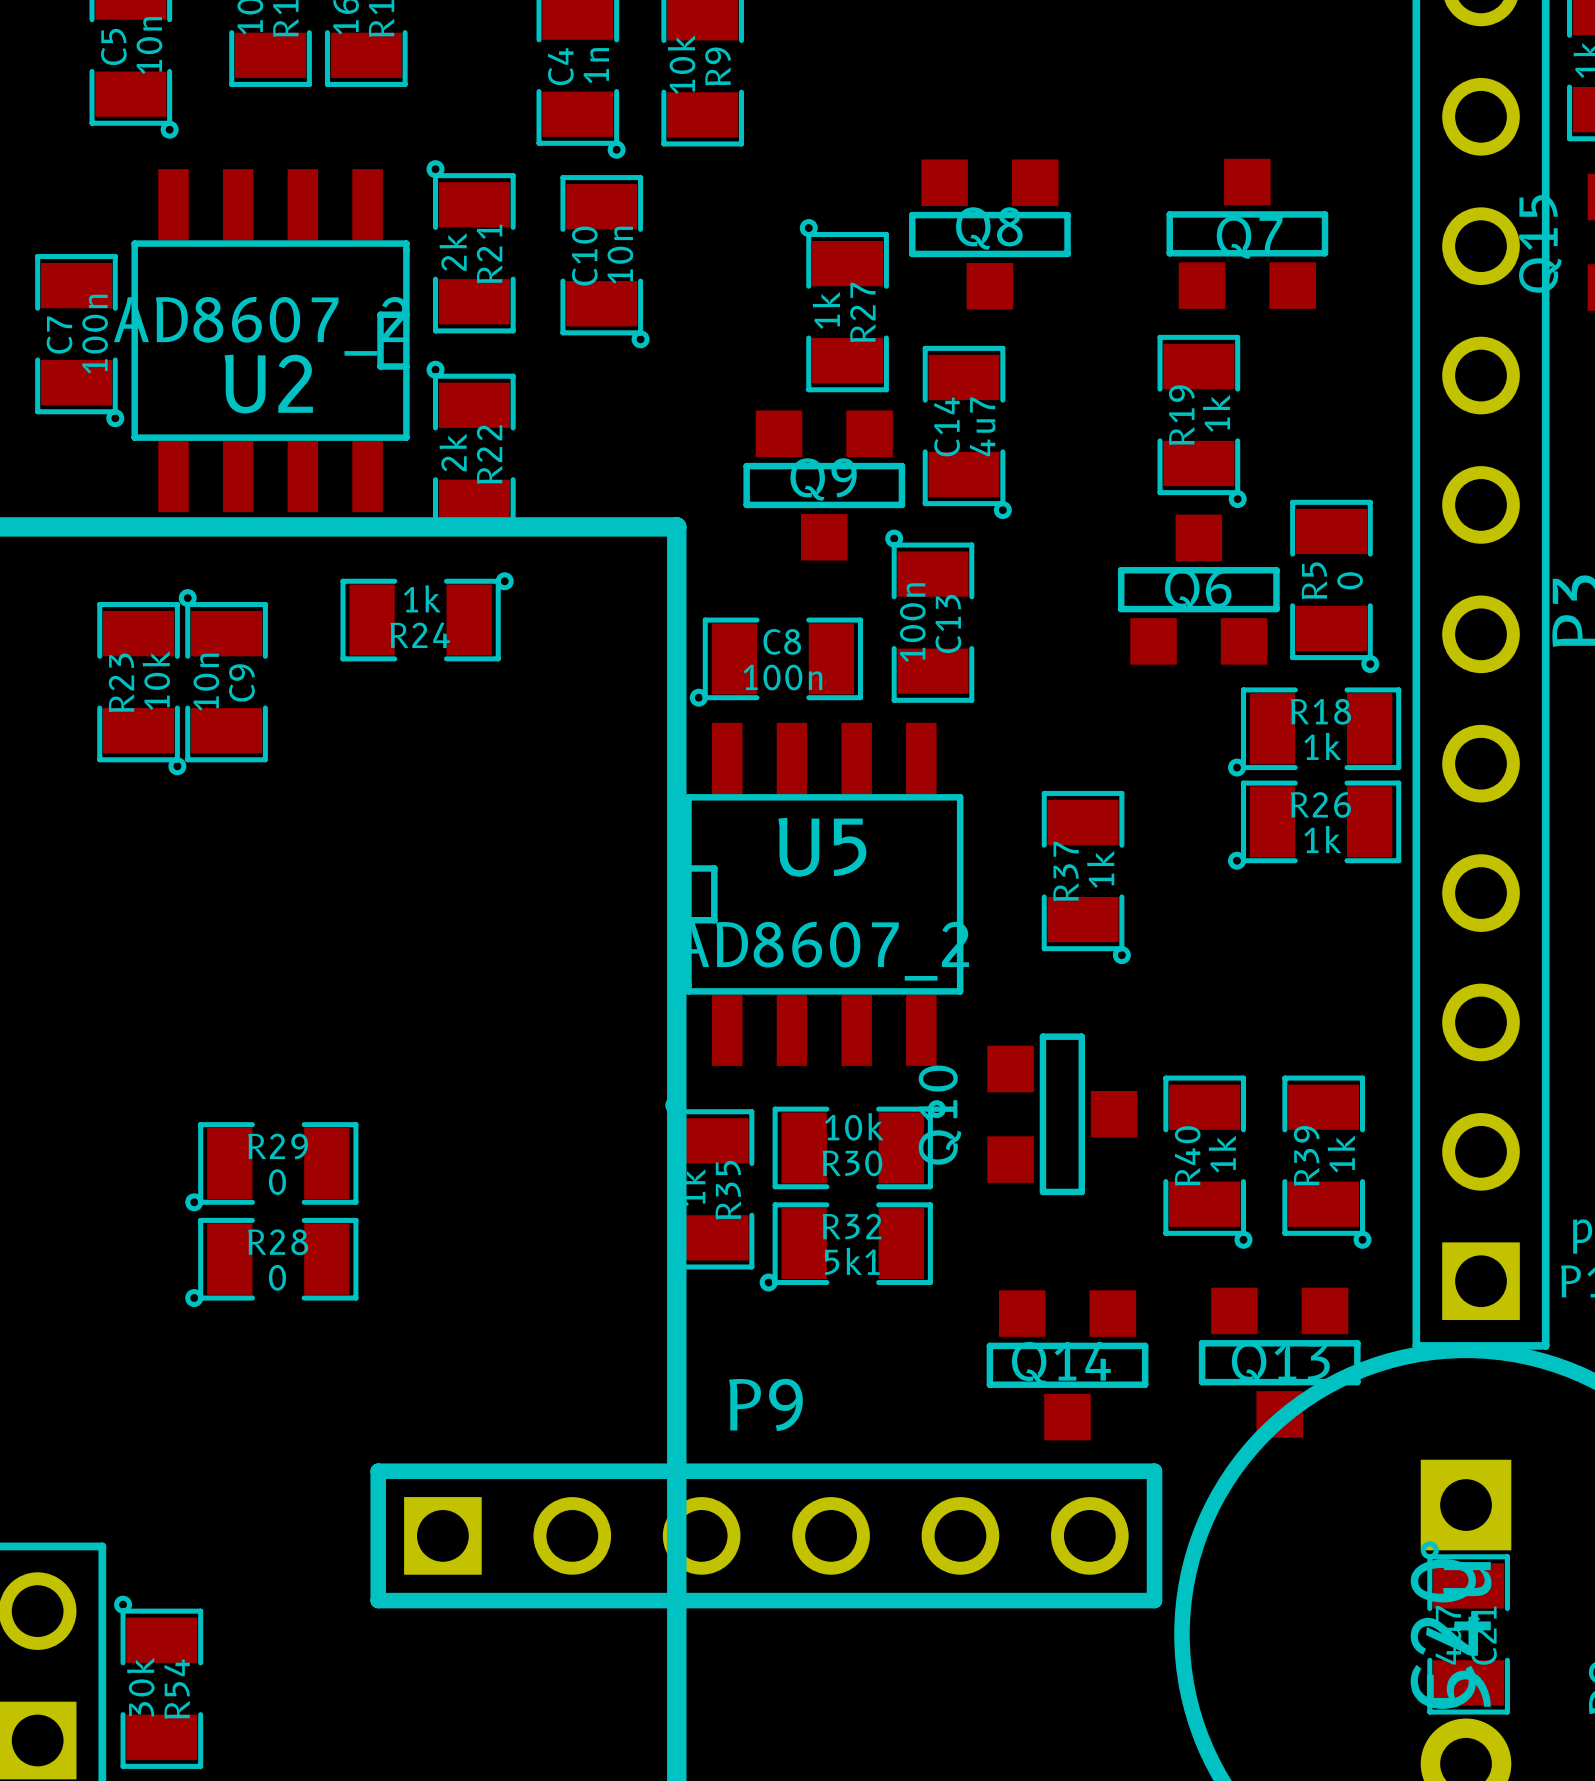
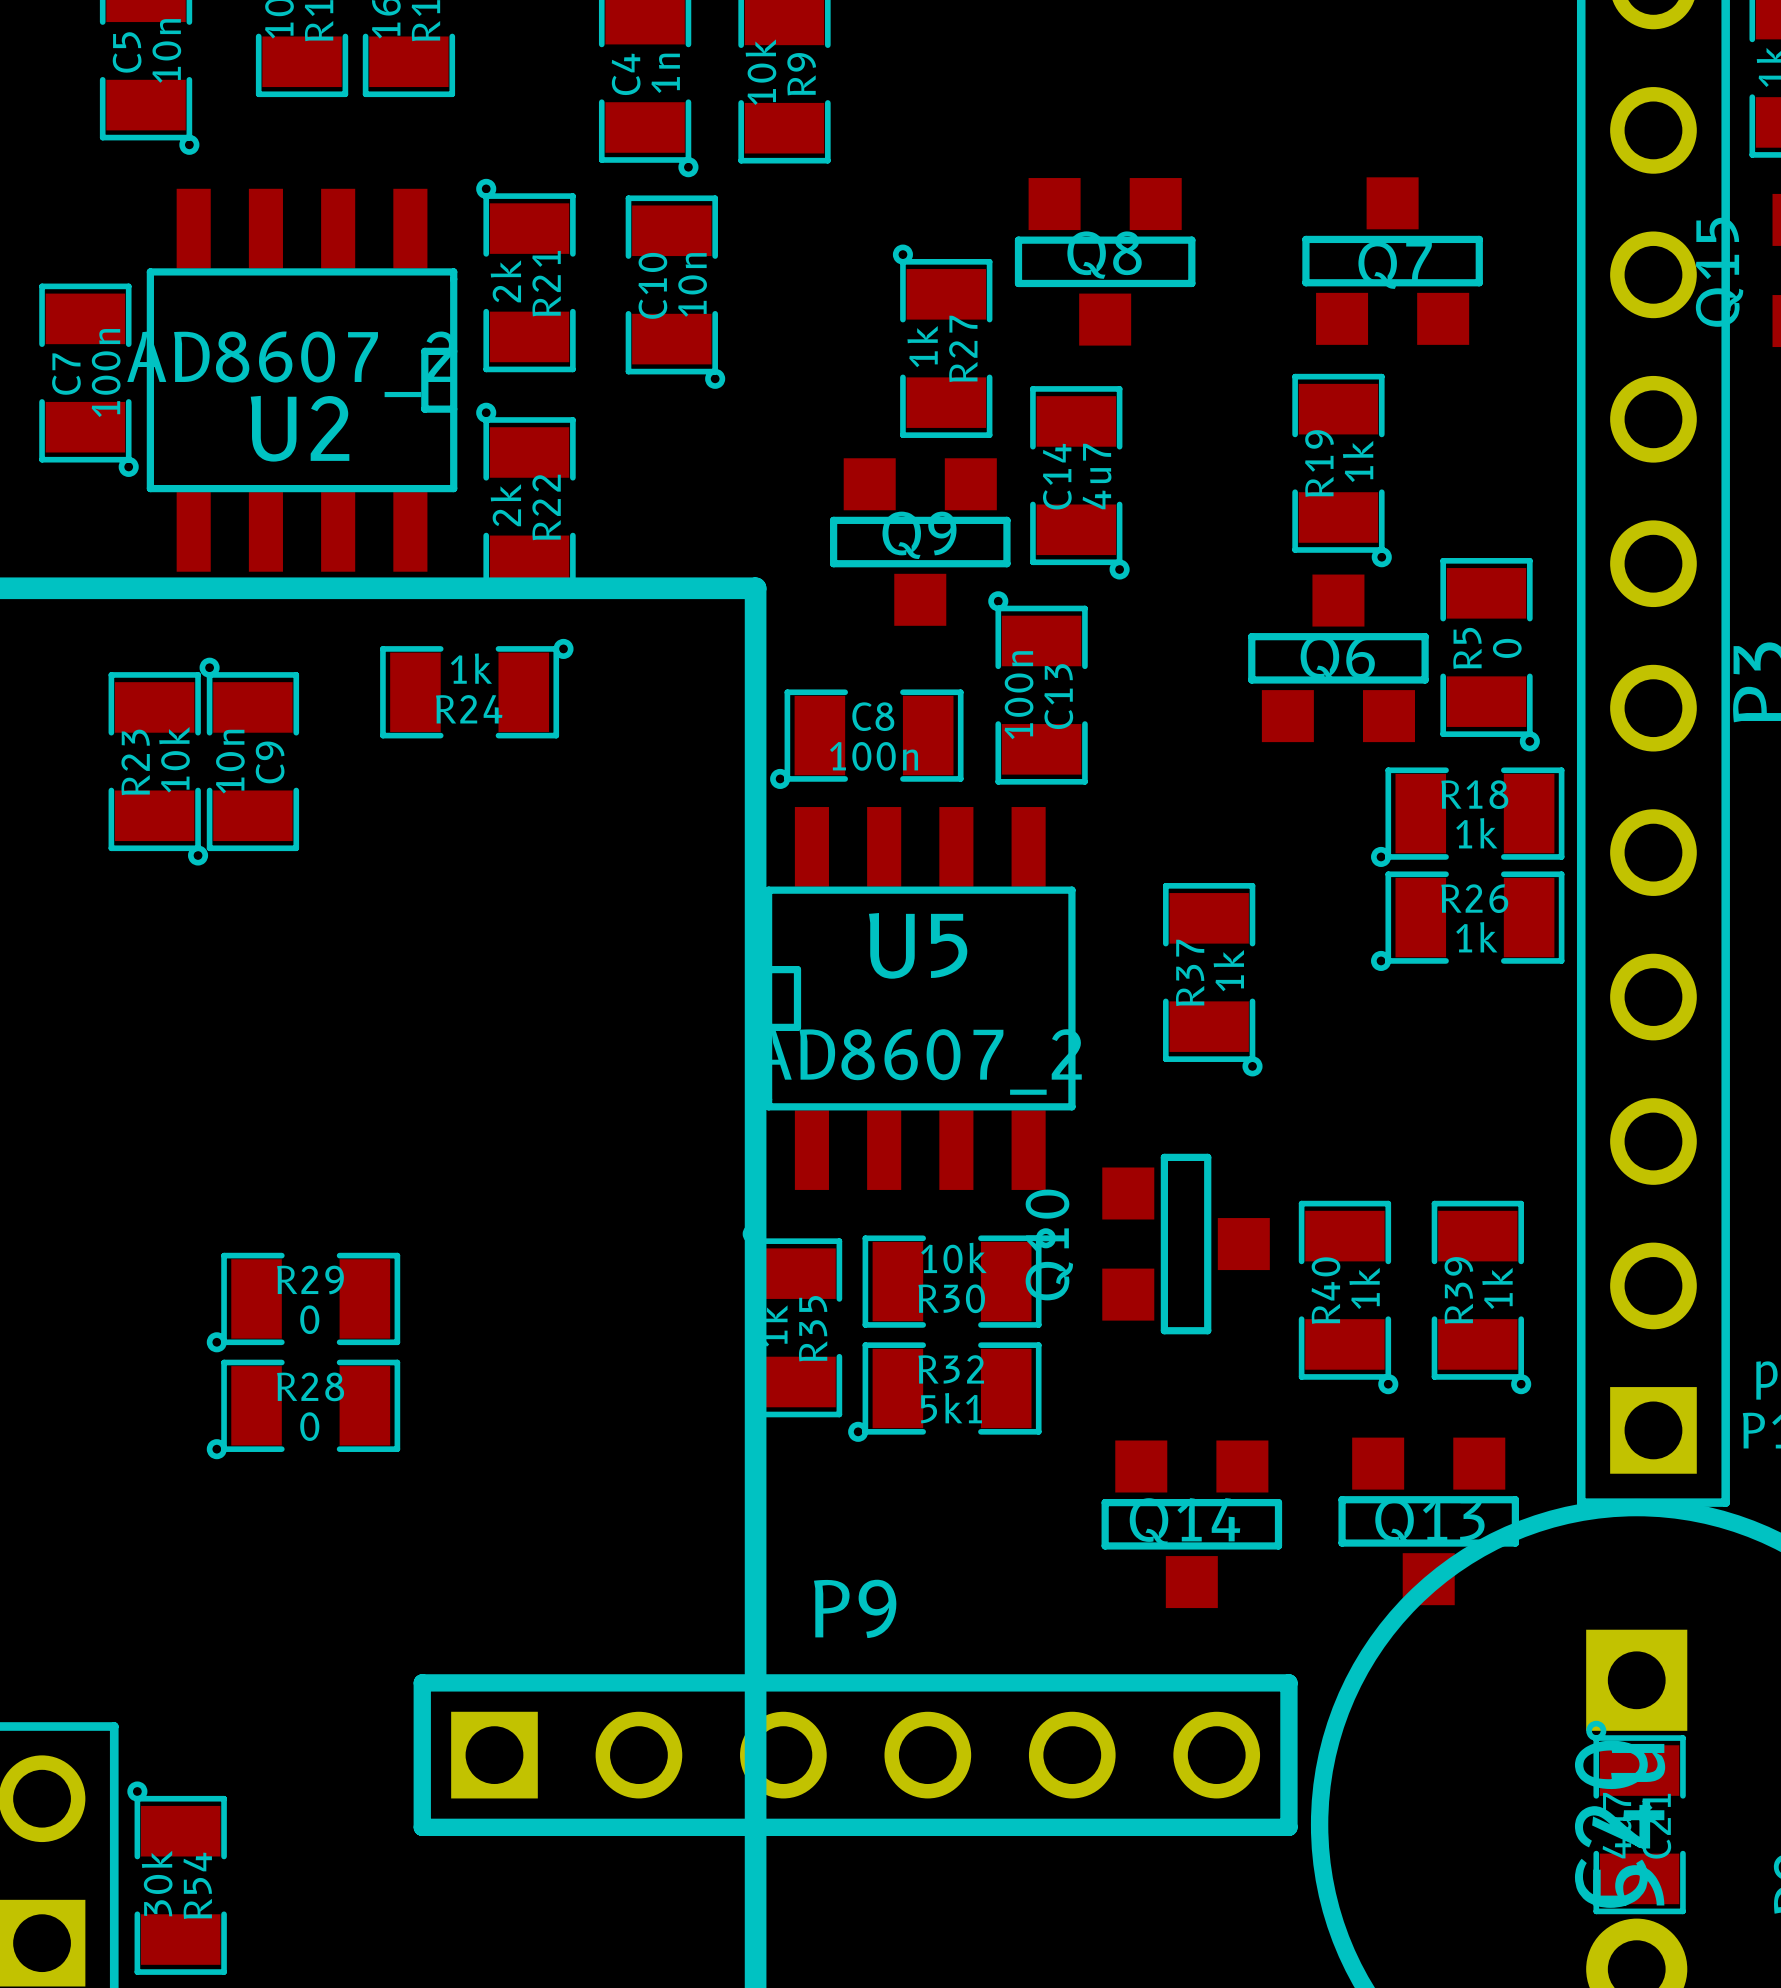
P9 position: (766, 1535) -> (855, 1755)

